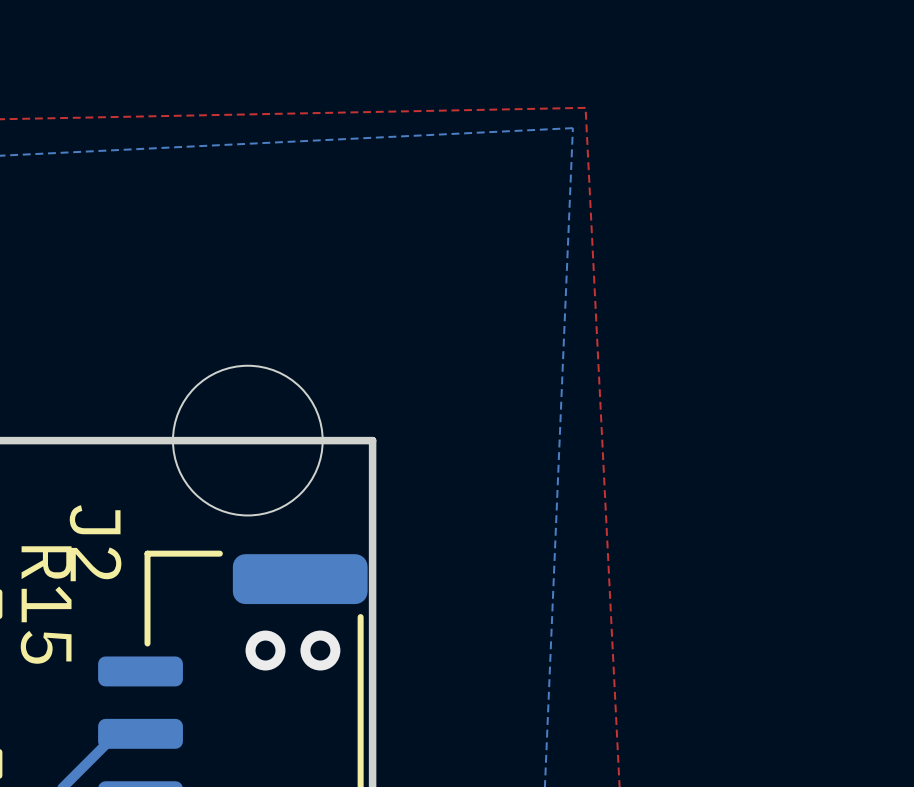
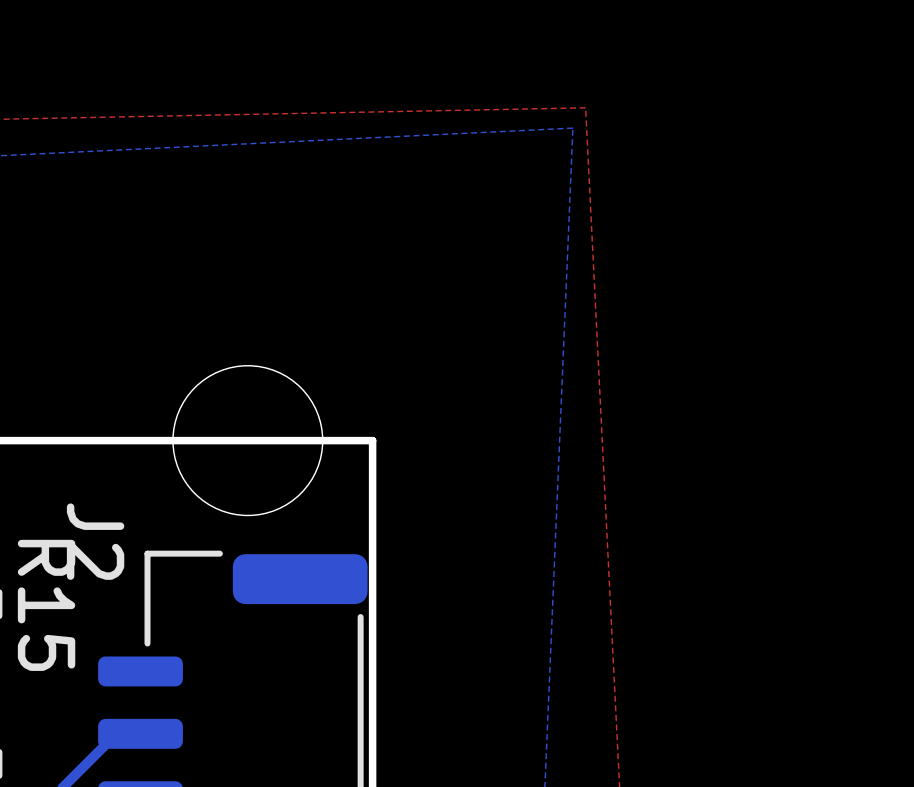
via: (265, 650) -> none
via: (320, 650) -> none

